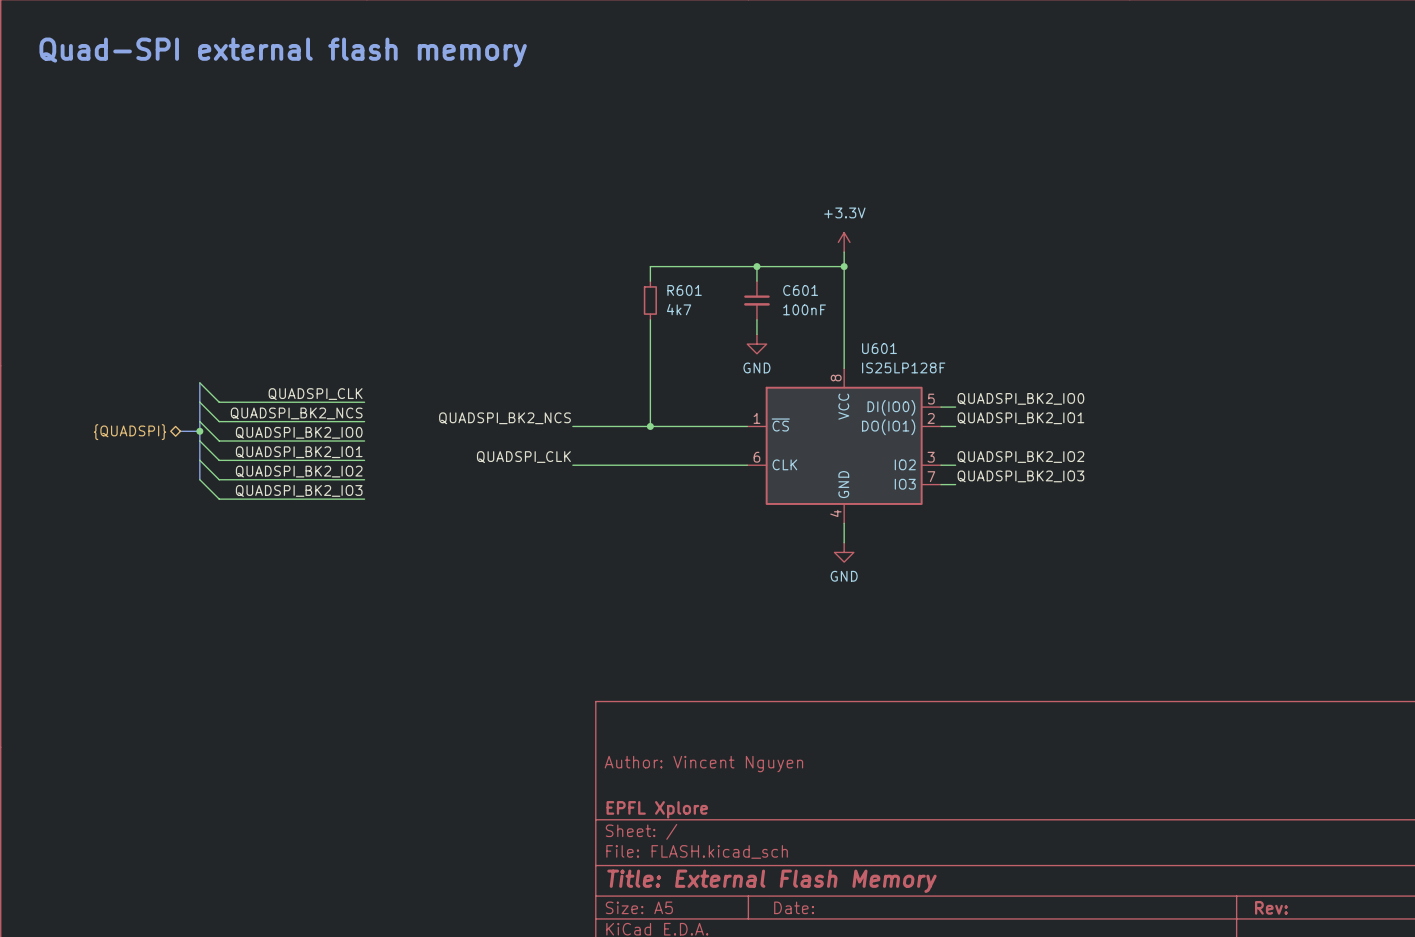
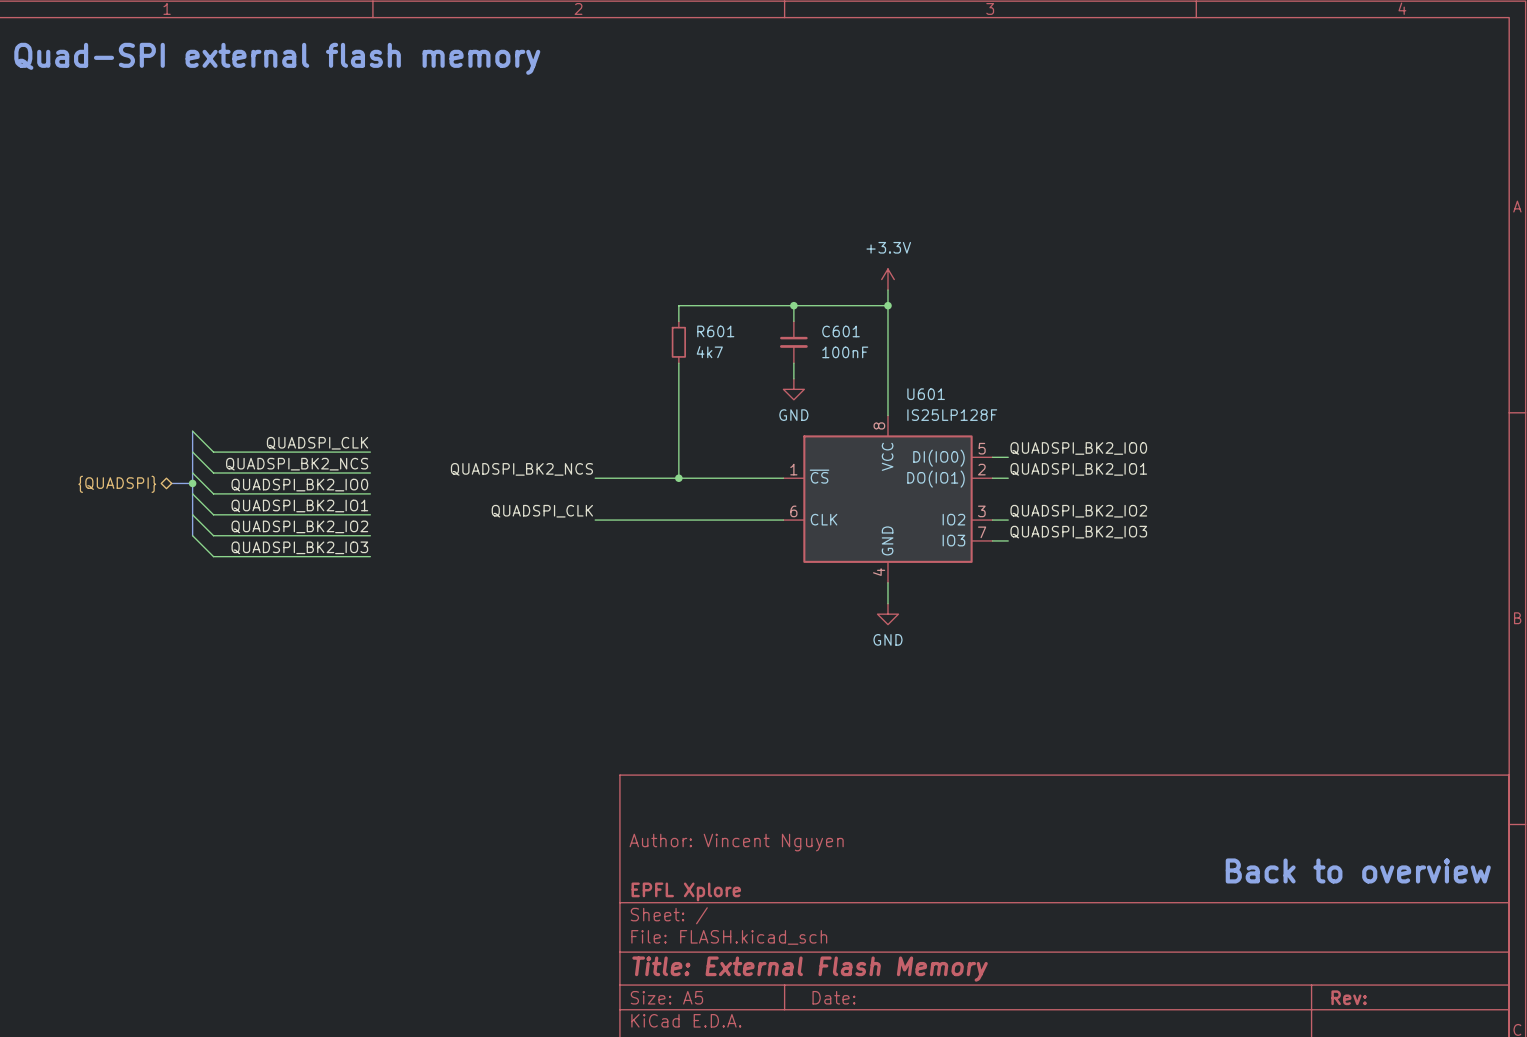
text position: Quad-SPI external flash memory (283, 52) -> Quad-SPI external flash memory (277, 58)
text: none -> Back to overview (1358, 870)

